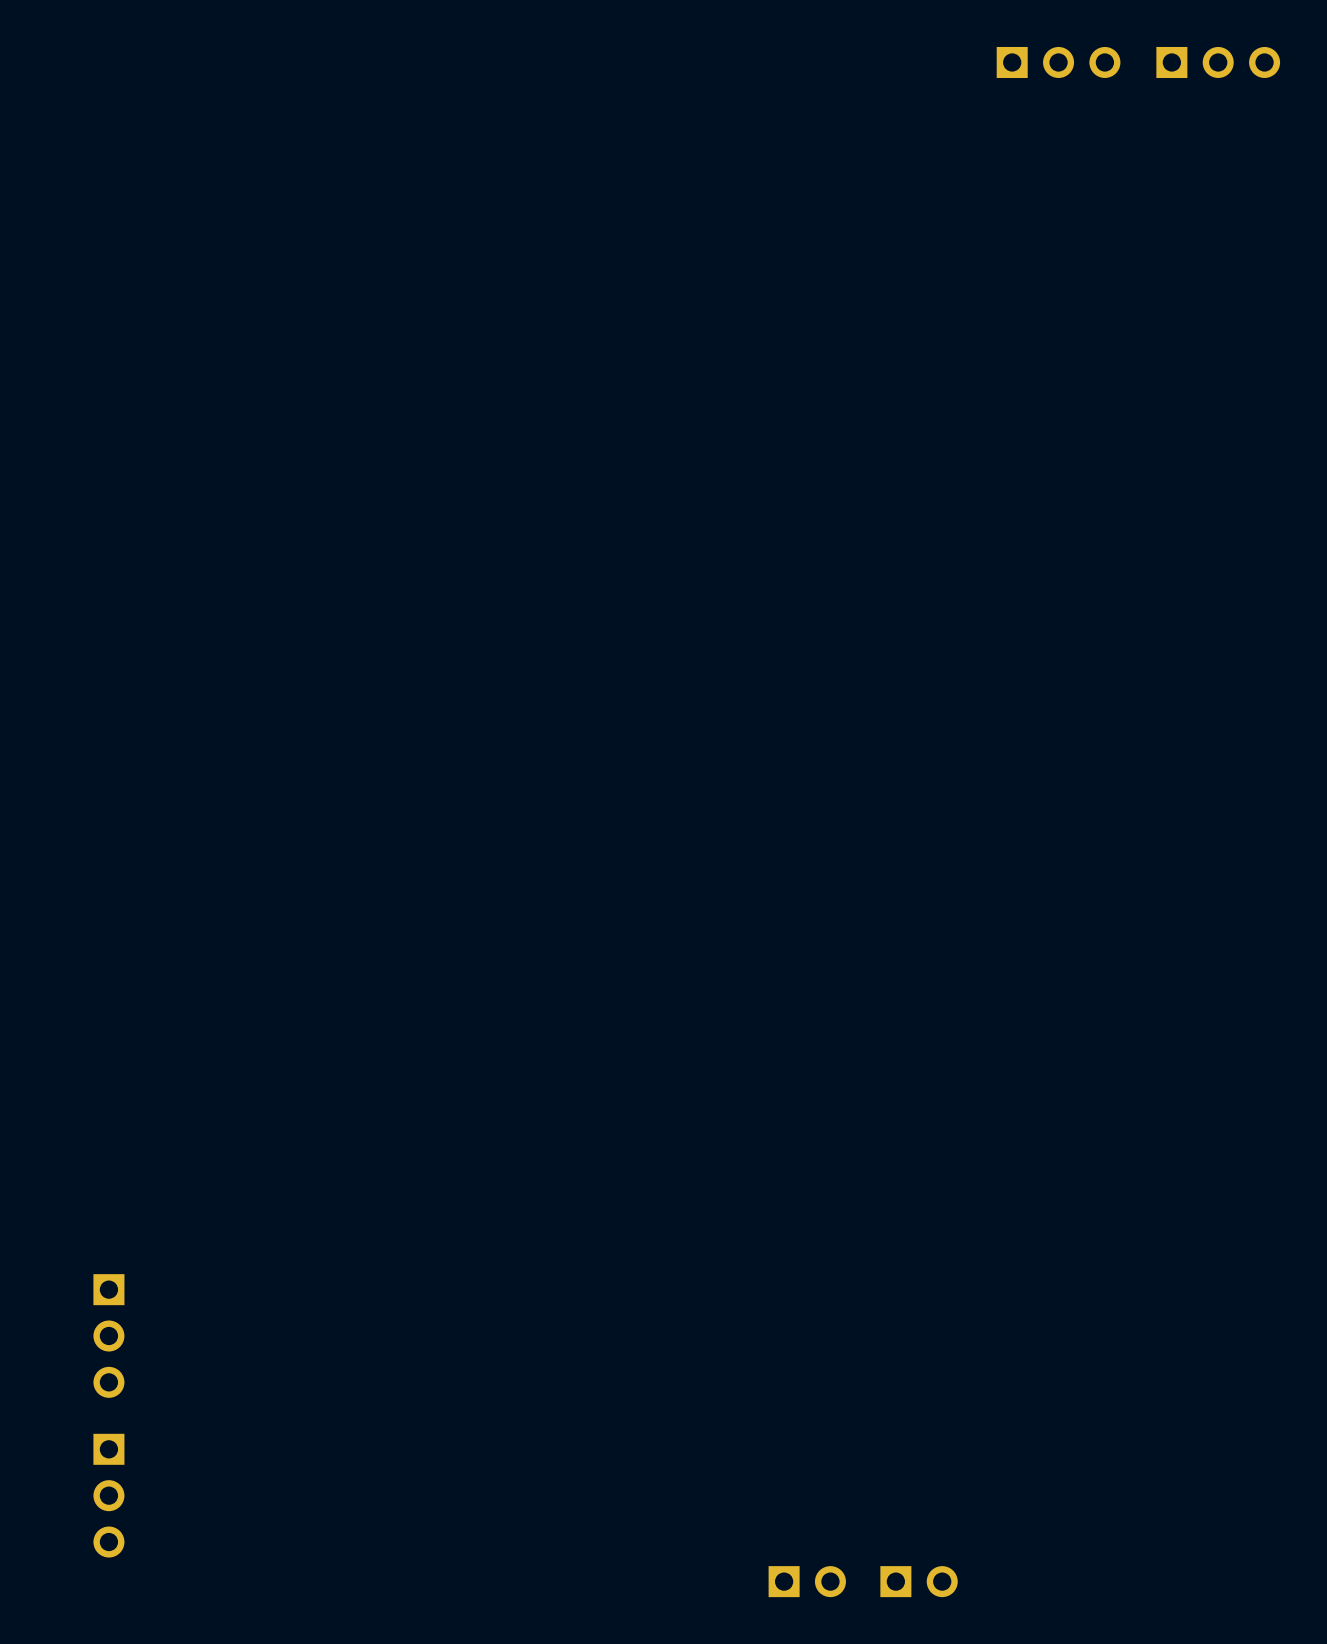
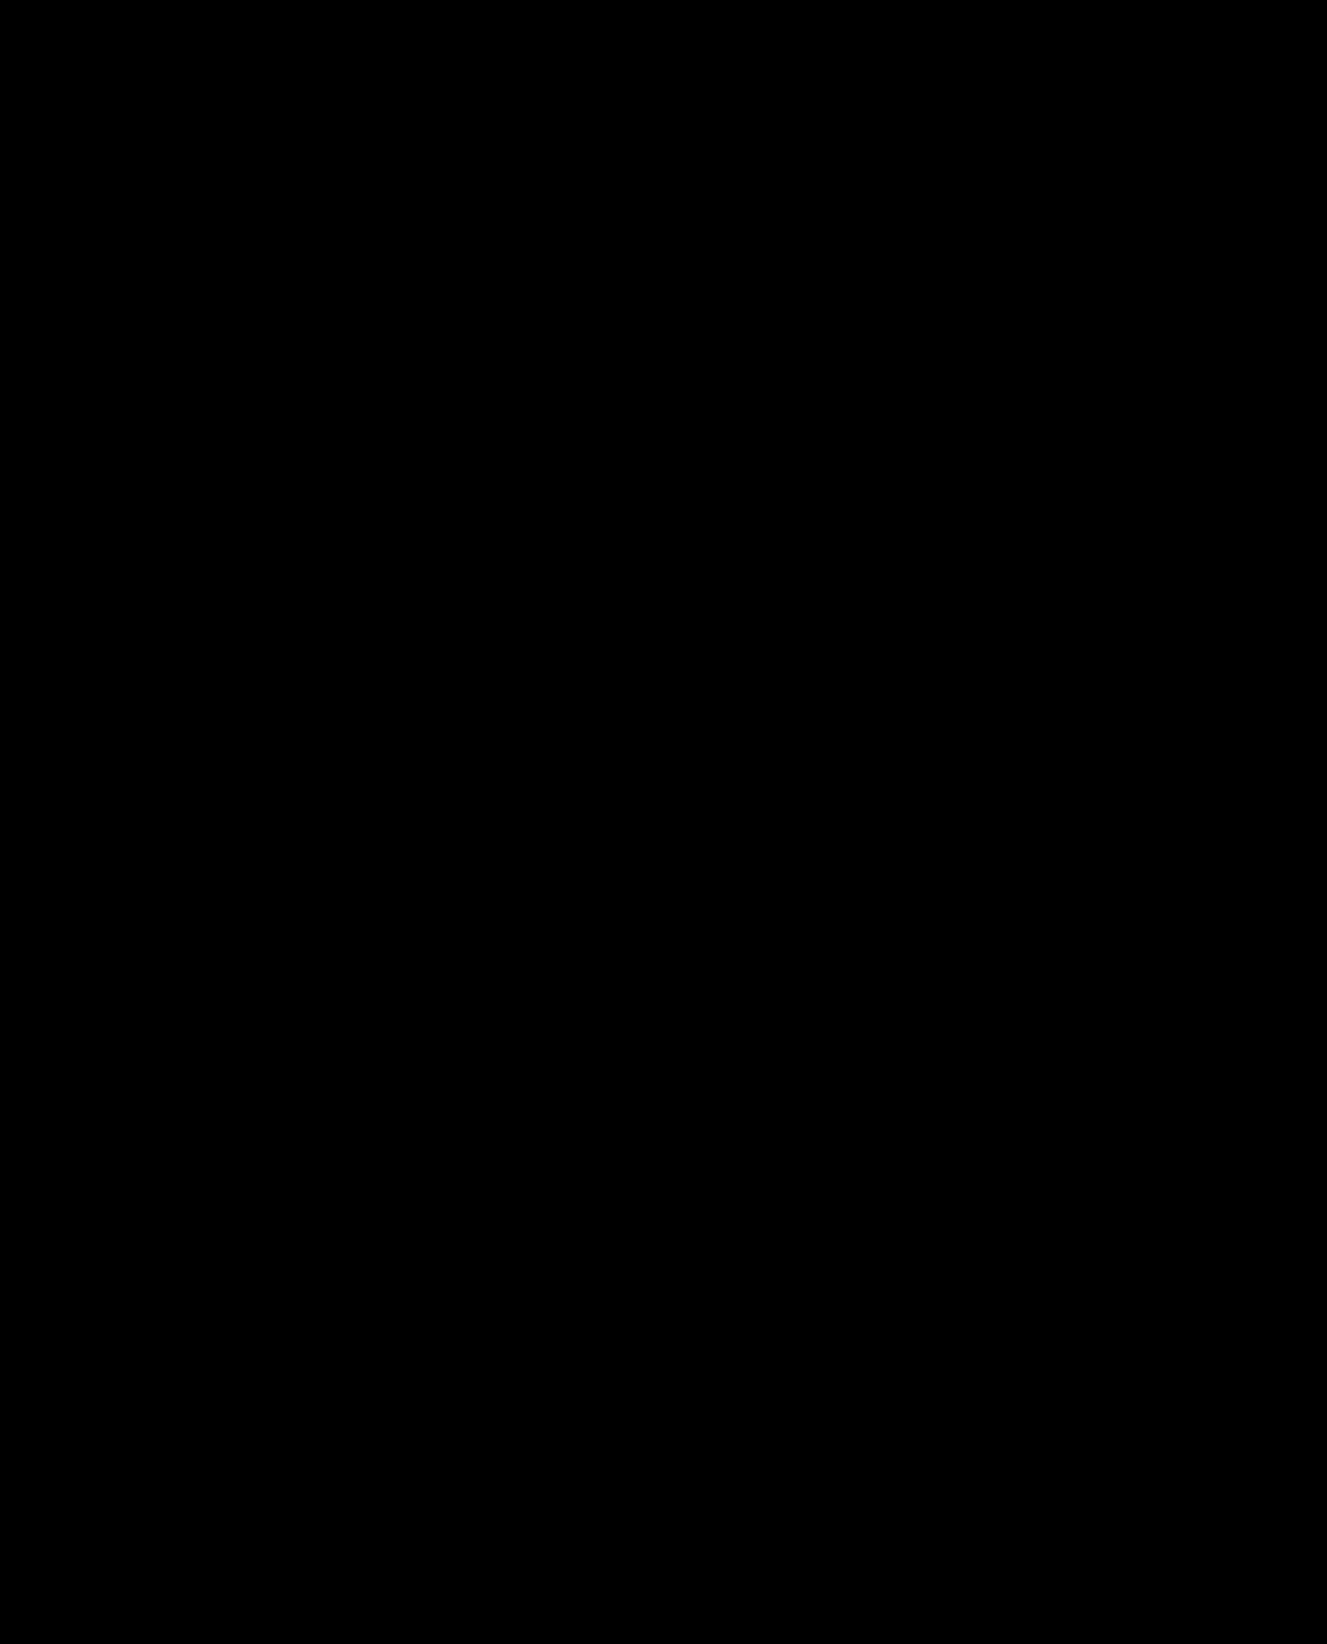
part: (1058, 62) -> none
part: (1218, 62) -> none
part: (108, 1336) -> none
part: (108, 1495) -> none
part: (807, 1581) -> none
part: (919, 1581) -> none

